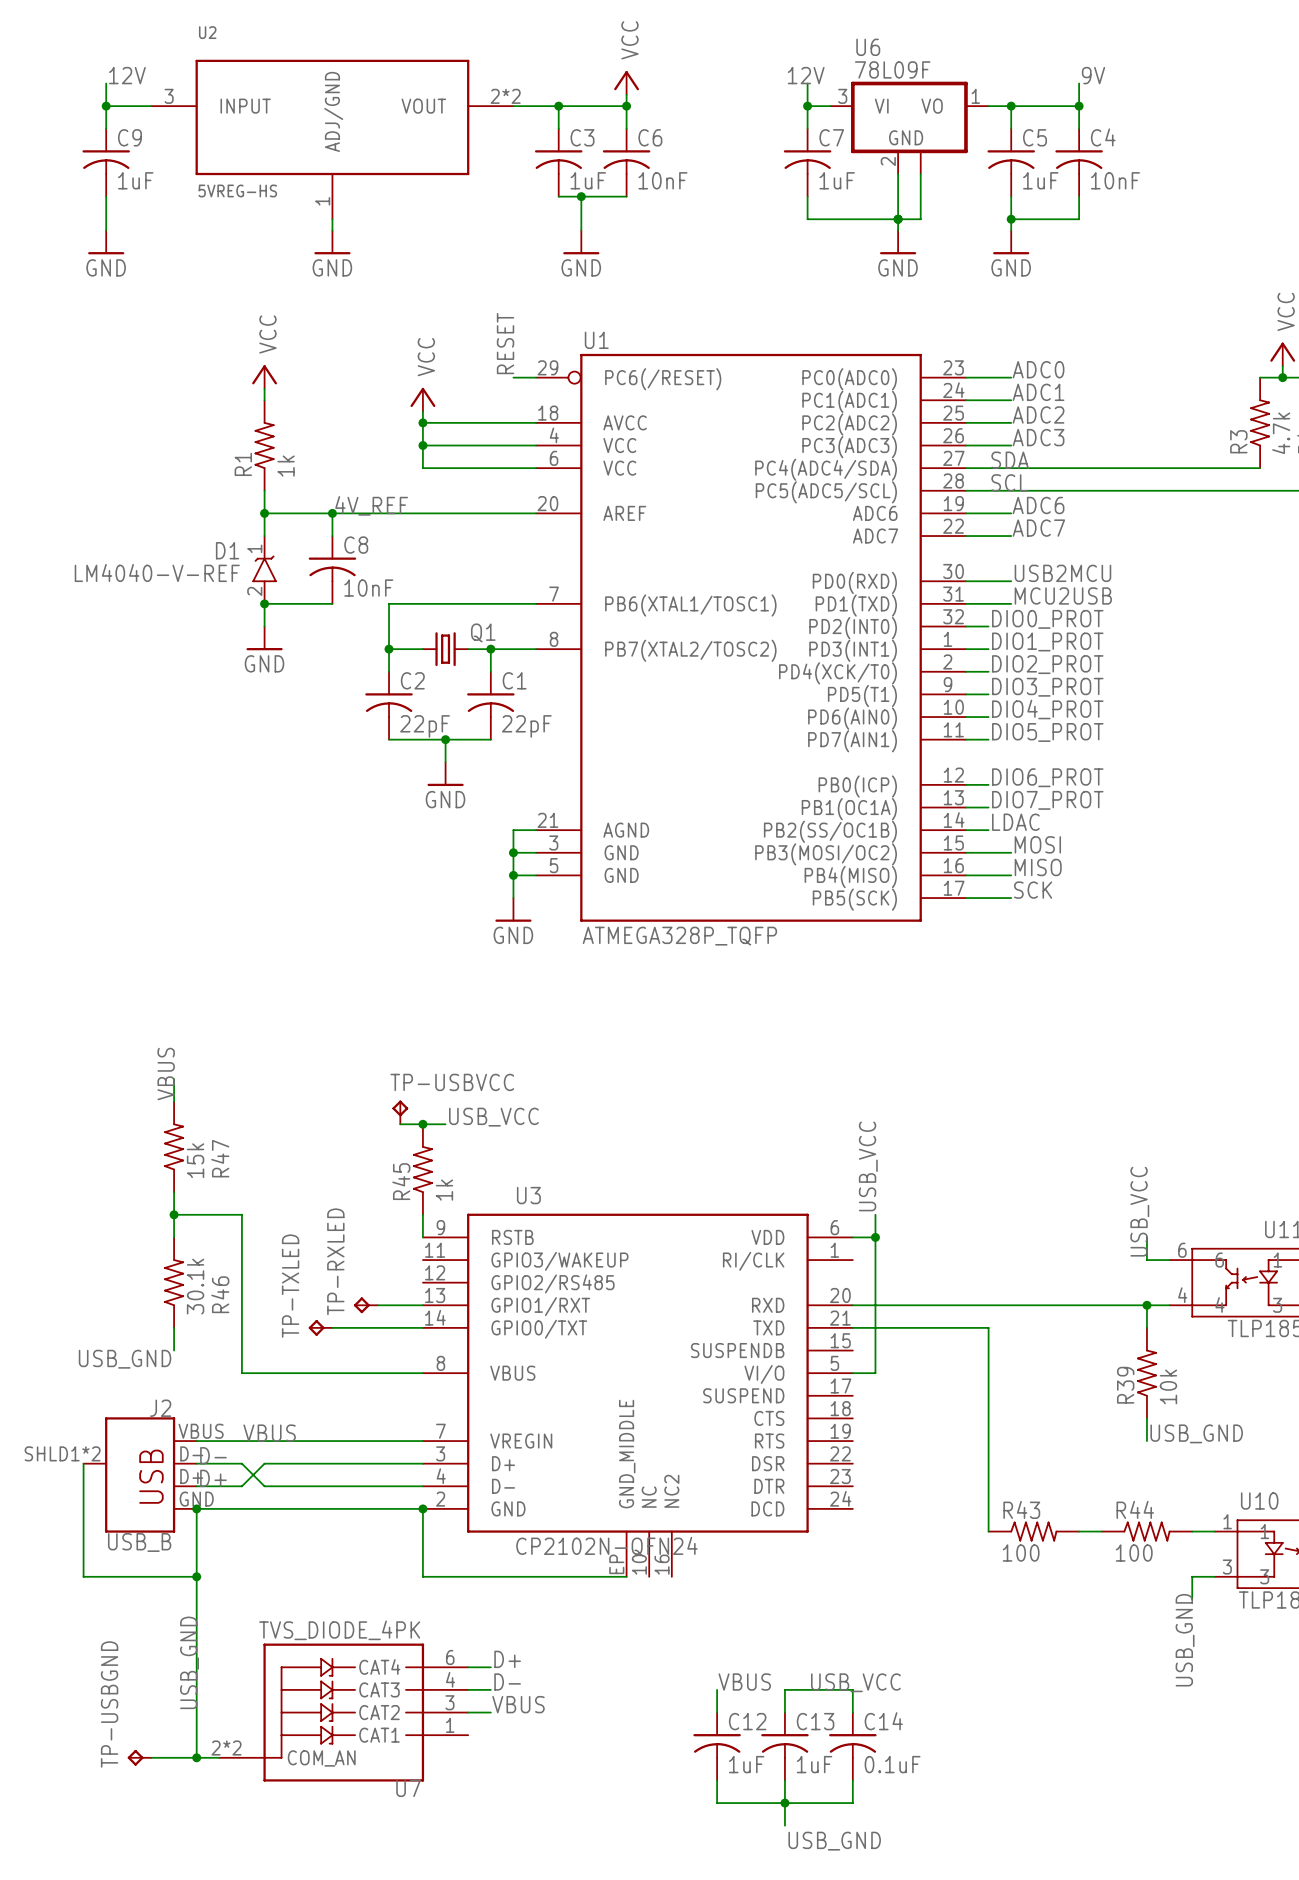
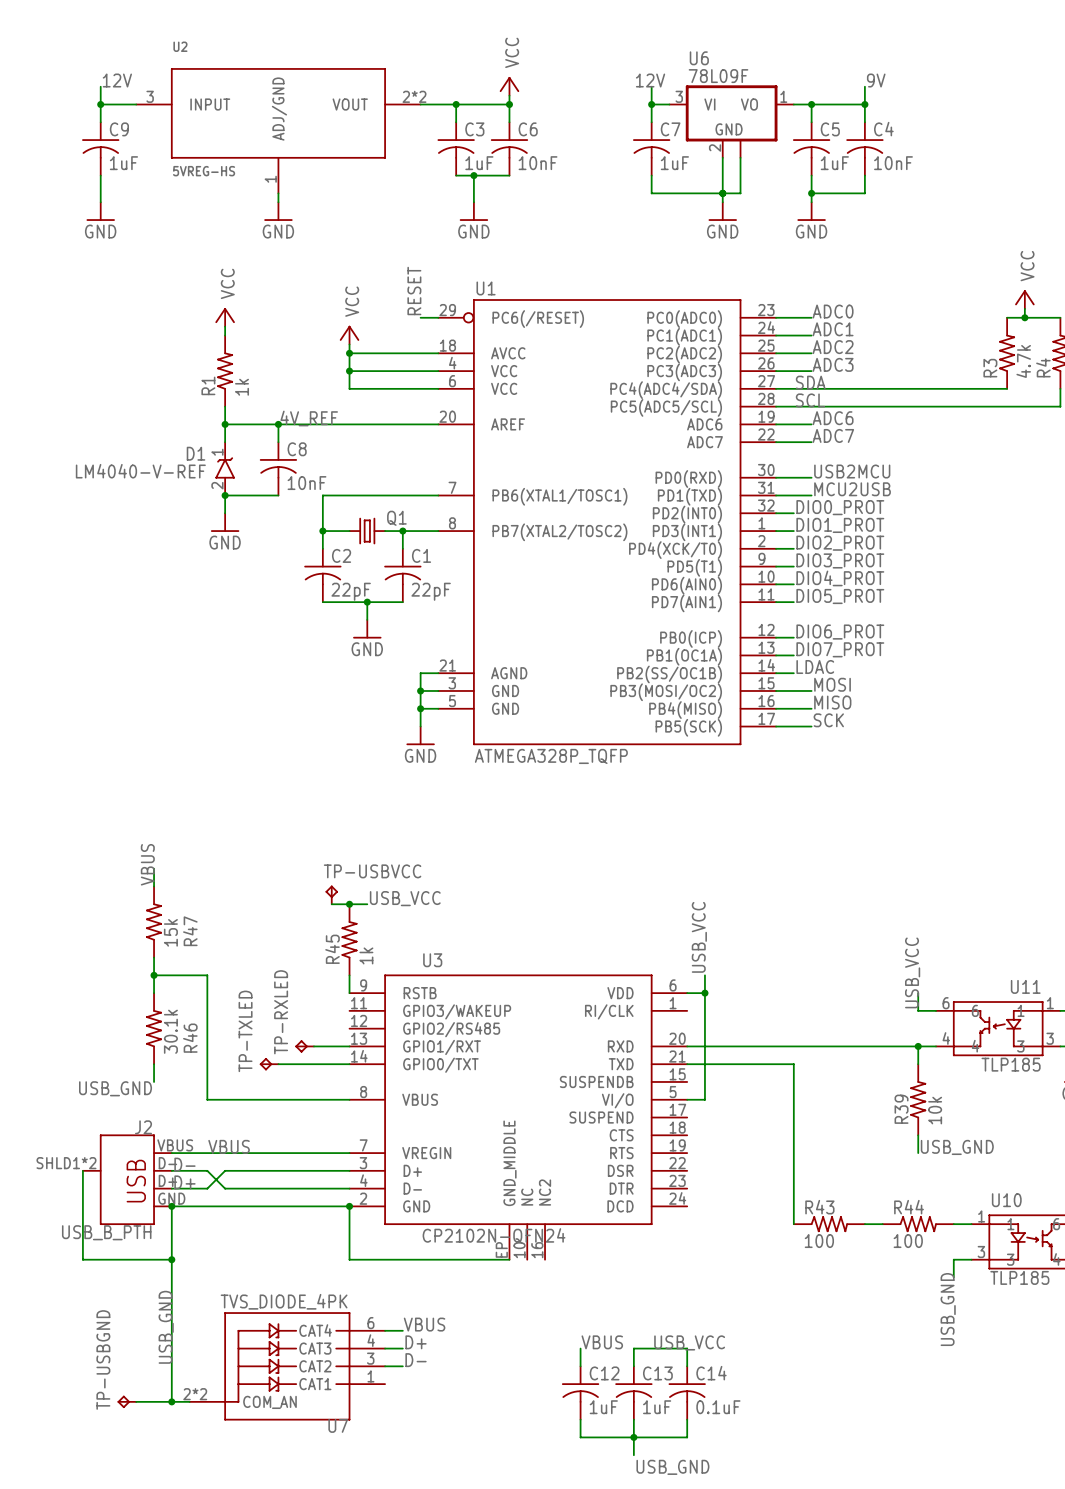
J2 value: USB_B (139, 1542) -> USB_B_PTH (106, 1232)
label: D+ (507, 1659) -> VBUS (424, 1324)
label: D- (507, 1682) -> D+ (416, 1342)
label: VBUS (518, 1704) -> D- (416, 1360)

